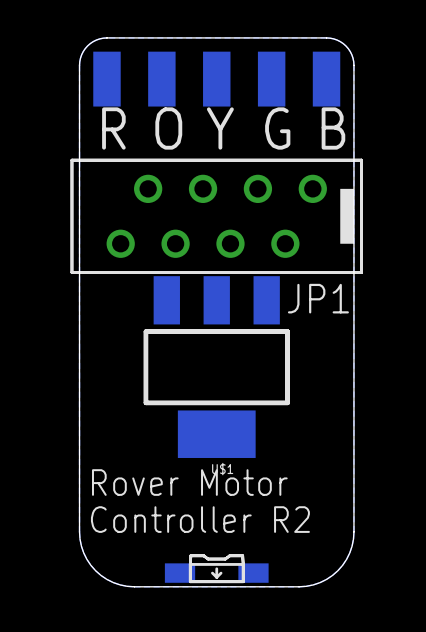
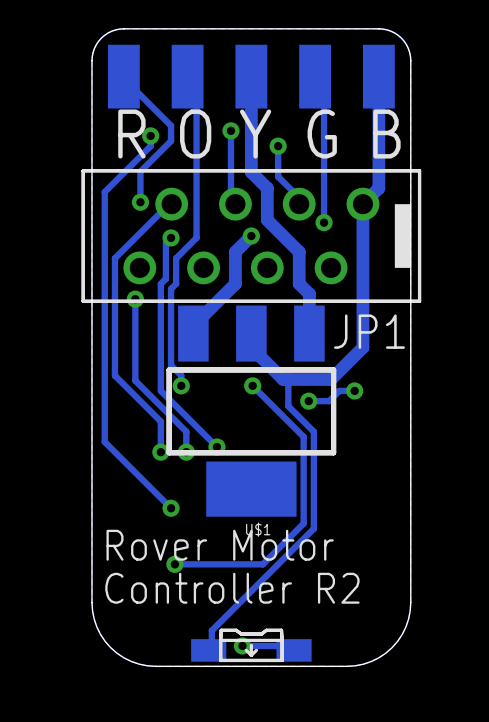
track: none -> (123, 76) (171, 125) (171, 141) (140, 171) (140, 202)
track: none -> (187, 76) (196, 84) (196, 237) (176, 258) (176, 283) (171, 288) (171, 365) (181, 375) (181, 385)
track: none -> (251, 76) (251, 172) (267, 188) (267, 220) (299, 251) (299, 283) (309, 294) (309, 333)
track: none -> (315, 76) (324, 84) (324, 222)
track: none -> (378, 76) (378, 188) (362, 204) (362, 347) (331, 379) (283, 379) (251, 347) (251, 333)
track: none -> (230, 130) (230, 199) (235, 204)
via: none -> (230, 130)
track: none -> (150, 135) (150, 146) (104, 192) (104, 441) (171, 508)
via: none -> (150, 135)
track: none -> (278, 146) (278, 176) (303, 202) (299, 204)
via: none -> (278, 146)
via: none -> (140, 202)
track: none -> (171, 204) (171, 202) (114, 258) (114, 375) (160, 421) (160, 452)
via: none -> (324, 222)
track: none -> (251, 236) (235, 251) (235, 283) (193, 325) (193, 333)
via: none -> (251, 236)
track: none -> (171, 237) (165, 243) (165, 278) (160, 283) (160, 390) (216, 447)
via: none -> (171, 237)
track: none -> (135, 299) (135, 380) (186, 431) (186, 452)
via: none -> (135, 299)
track: none -> (288, 379) (288, 406) (313, 431) (313, 528) (211, 630) (211, 645) (208, 650)
via: none -> (181, 385)
track: none -> (252, 385) (303, 436) (303, 523) (262, 564) (174, 564)
via: none -> (252, 385)
track: none -> (354, 390) (339, 390) (329, 401) (308, 401)
via: none -> (354, 390)
via: none -> (308, 401)
via: none -> (216, 447)
via: none -> (160, 452)
via: none -> (186, 452)
via: none -> (171, 508)
via: none -> (174, 564)
track: none -> (242, 645) (293, 645) (294, 650)
via: none -> (242, 645)

